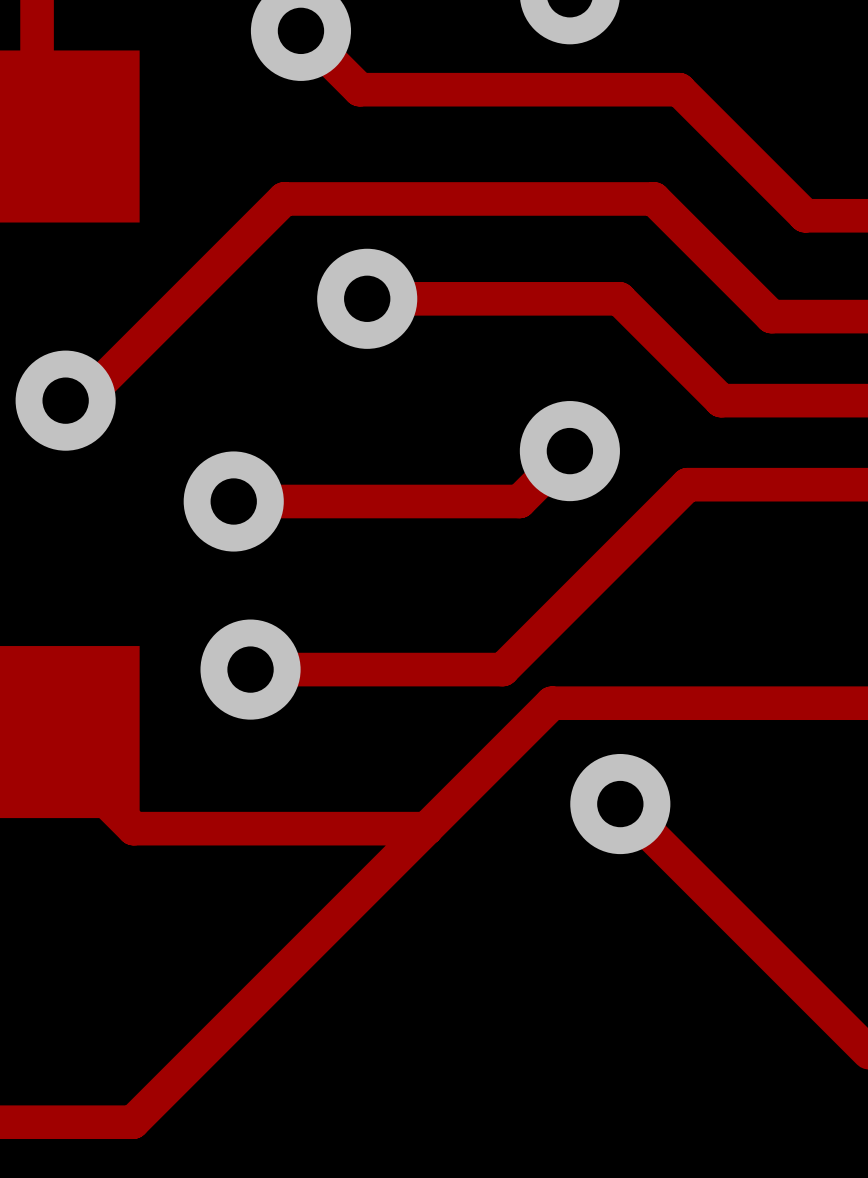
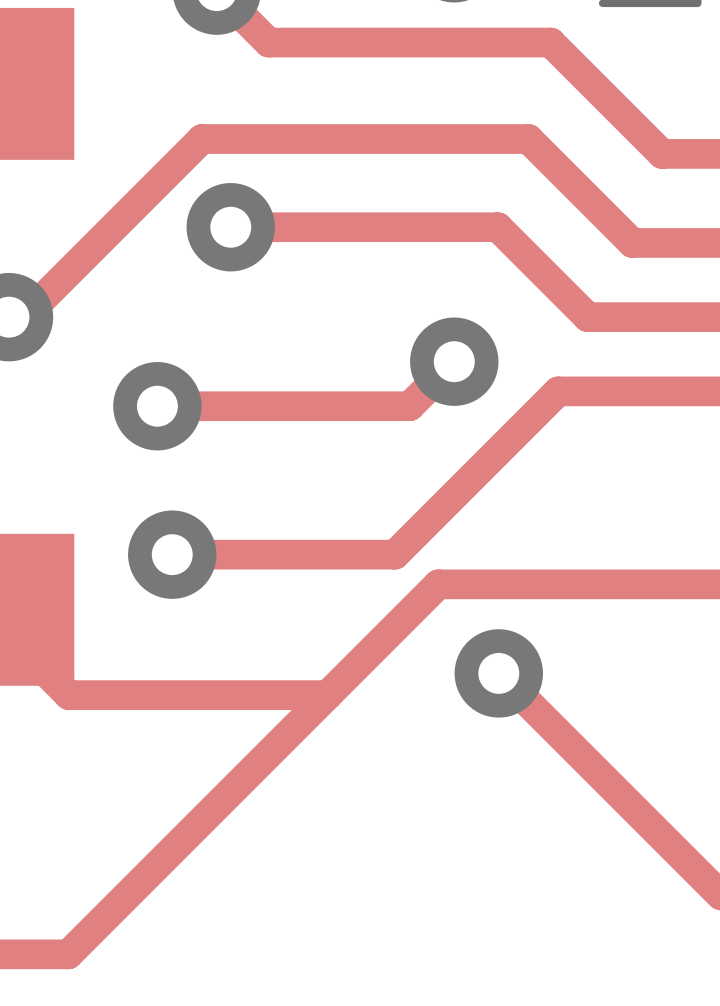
via position: (367, 298) -> (230, 227)

